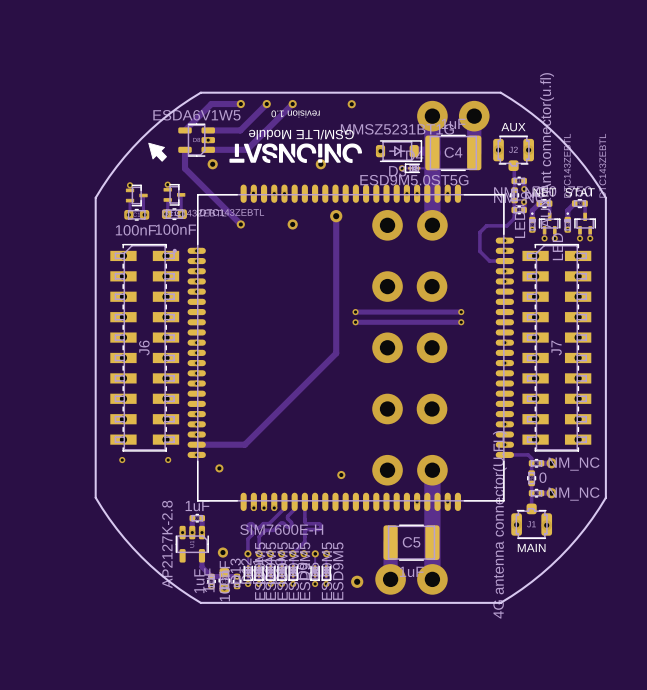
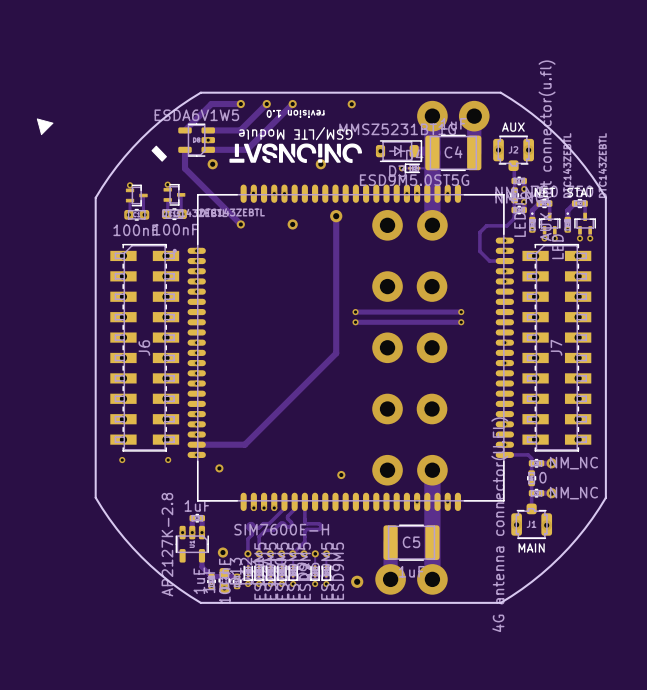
drawing position: (156, 151) -> (45, 126)

